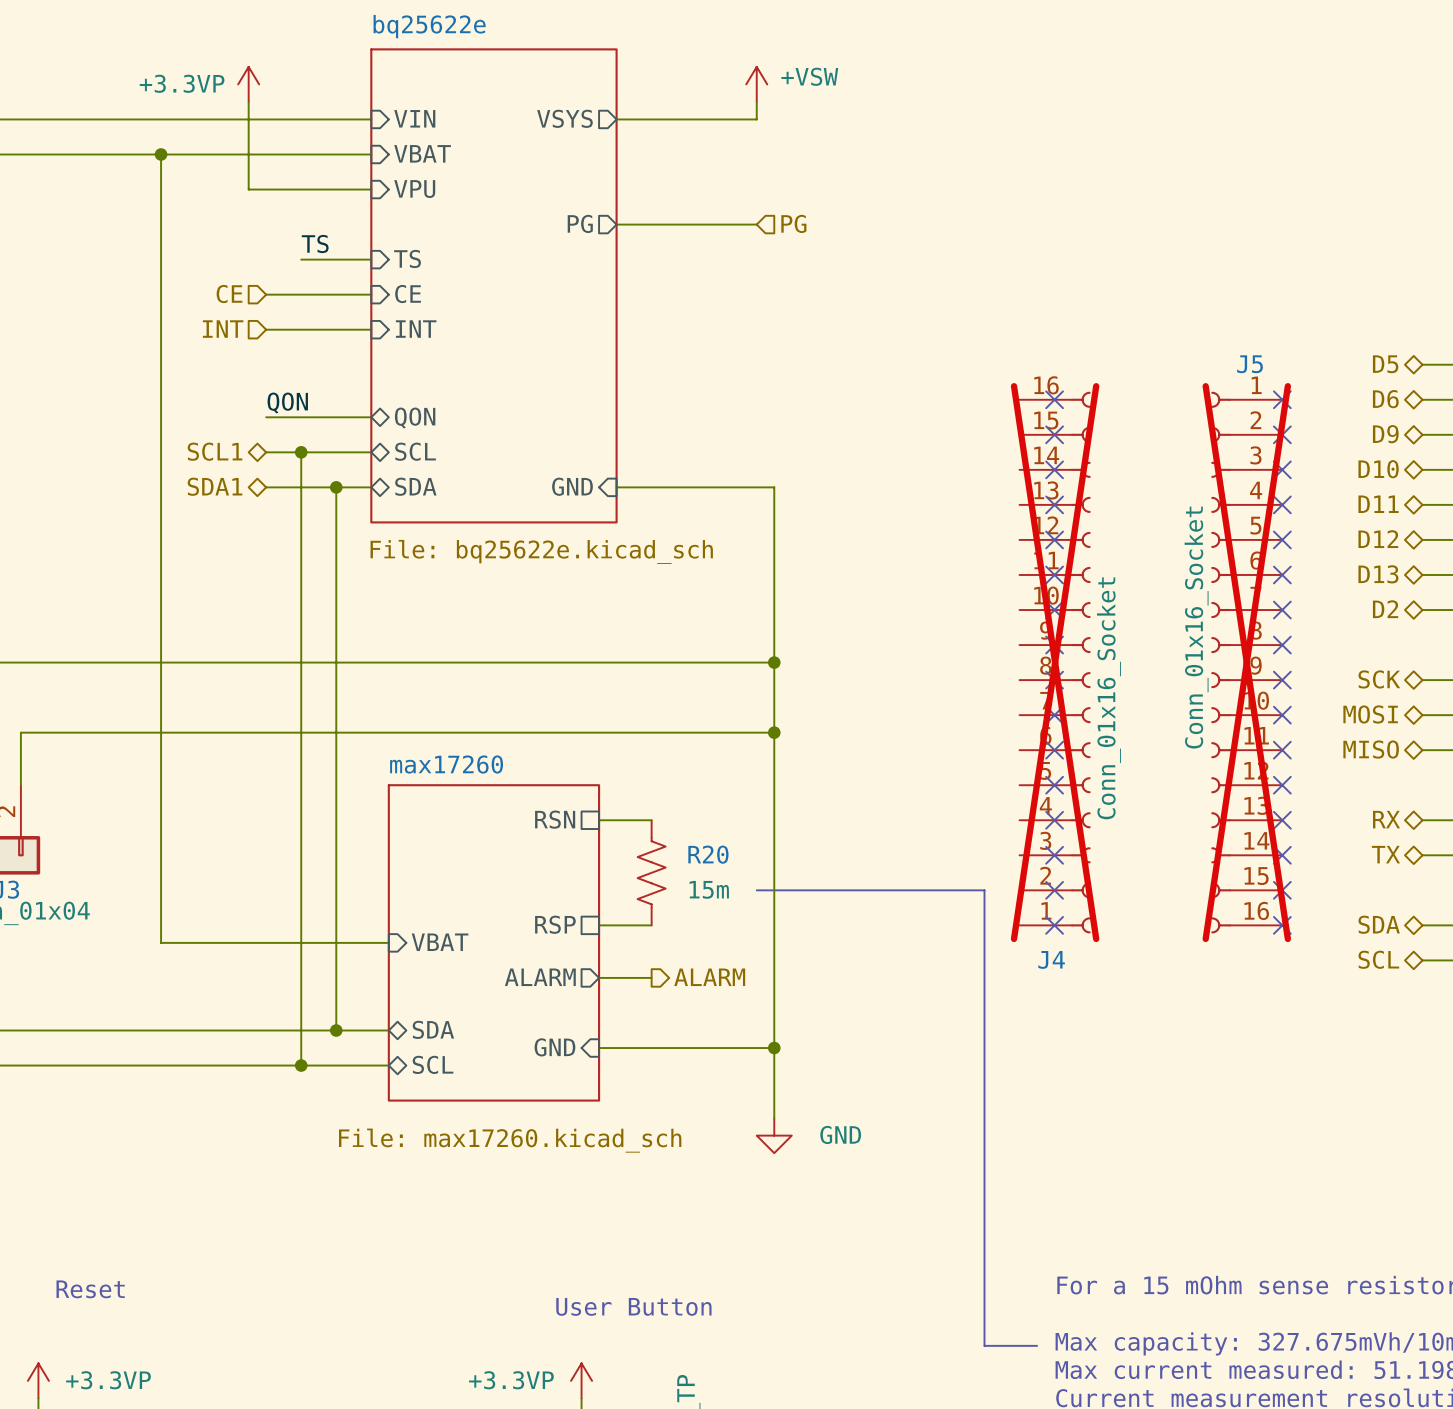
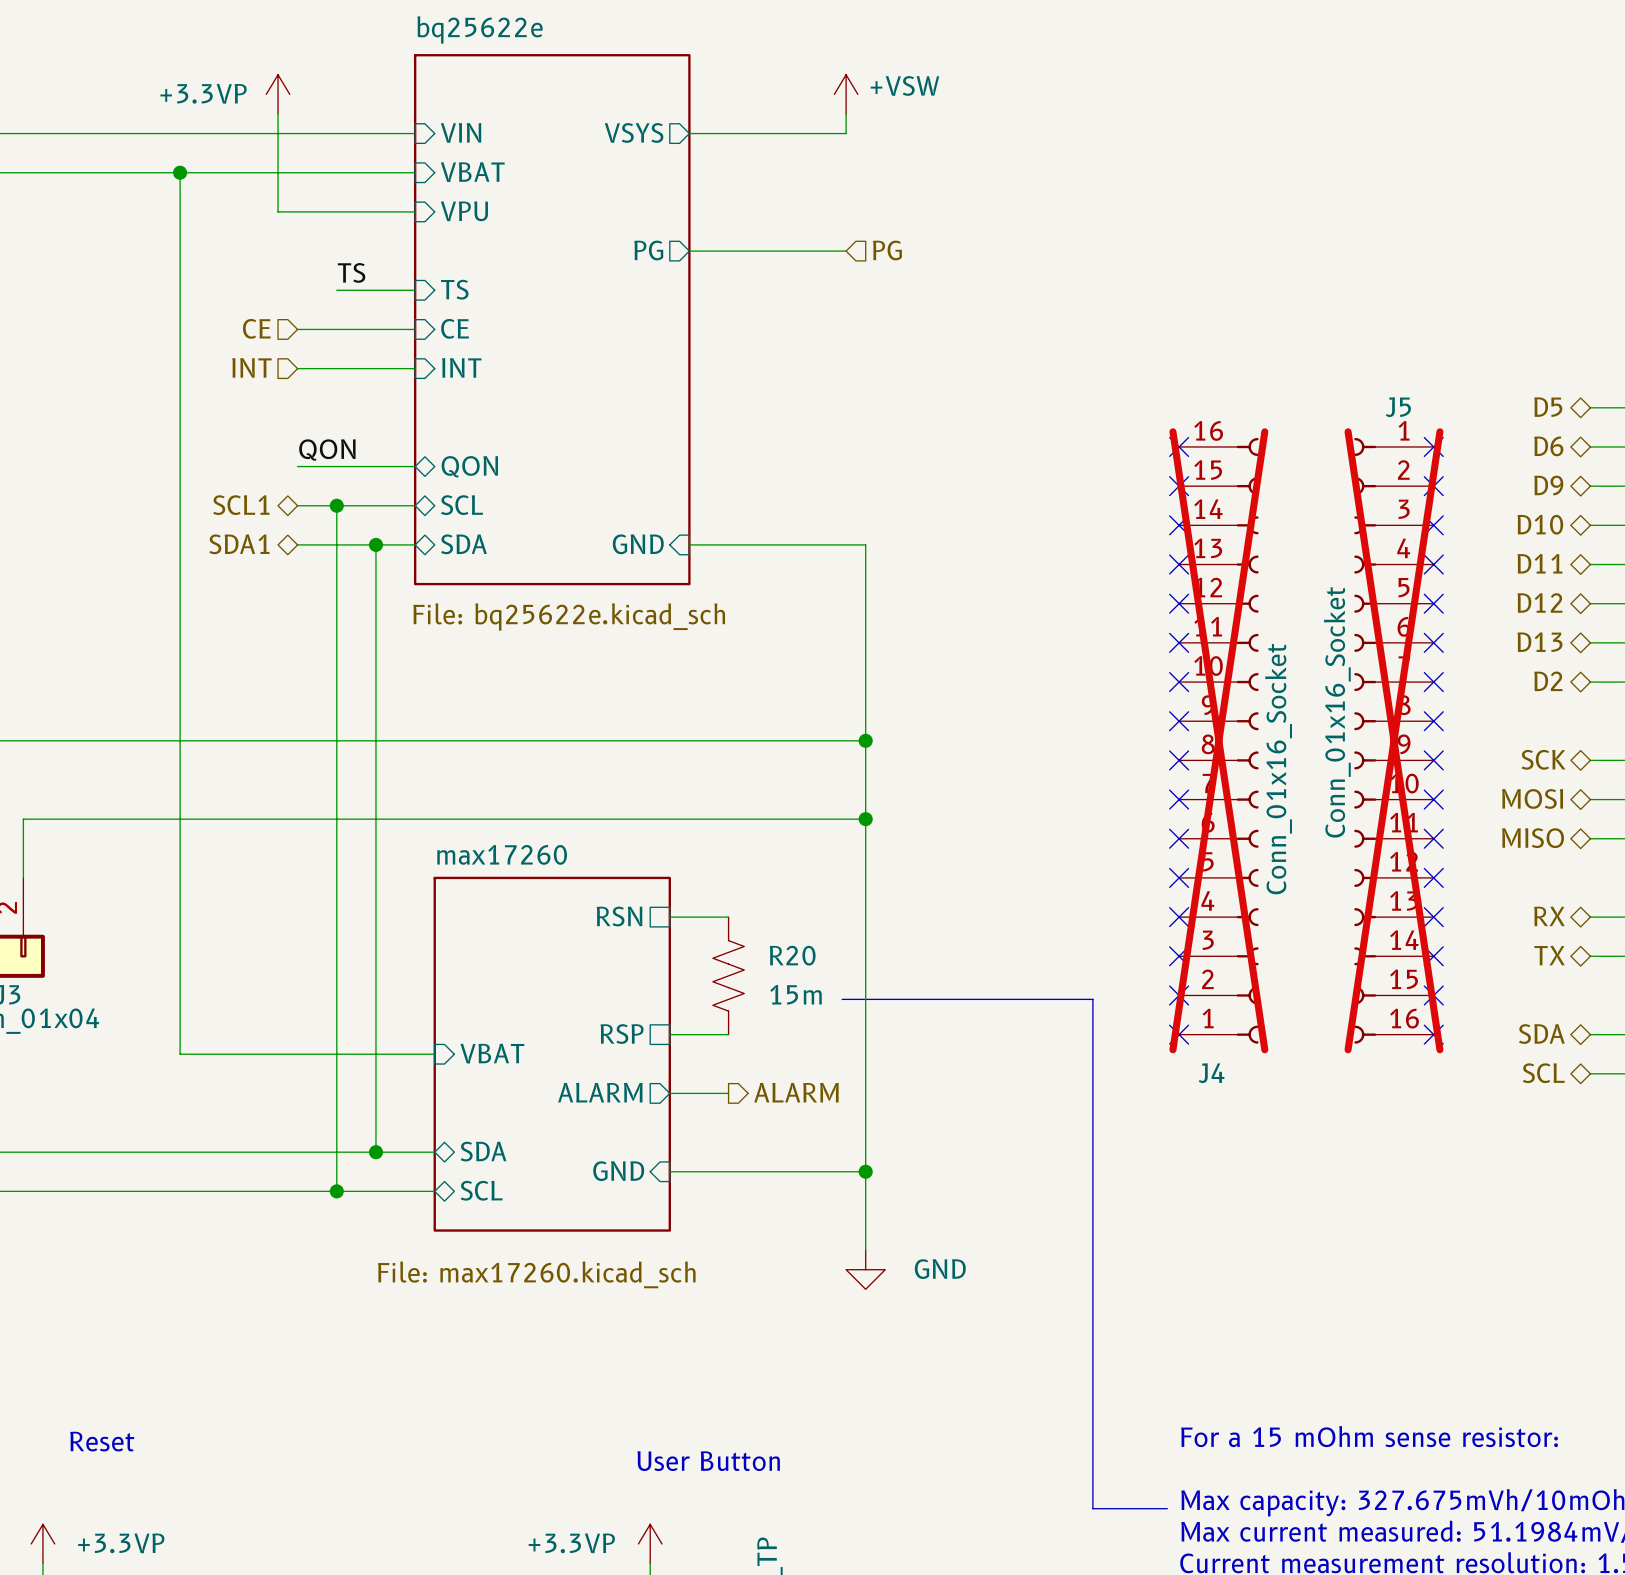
J4 position: (1055, 662) -> (1218, 740)
line: (756, 890) (984, 890) (984, 1345) (1037, 1345) -> none
line: none -> (842, 999) (1092, 999) (1092, 1508) (1167, 1508)

